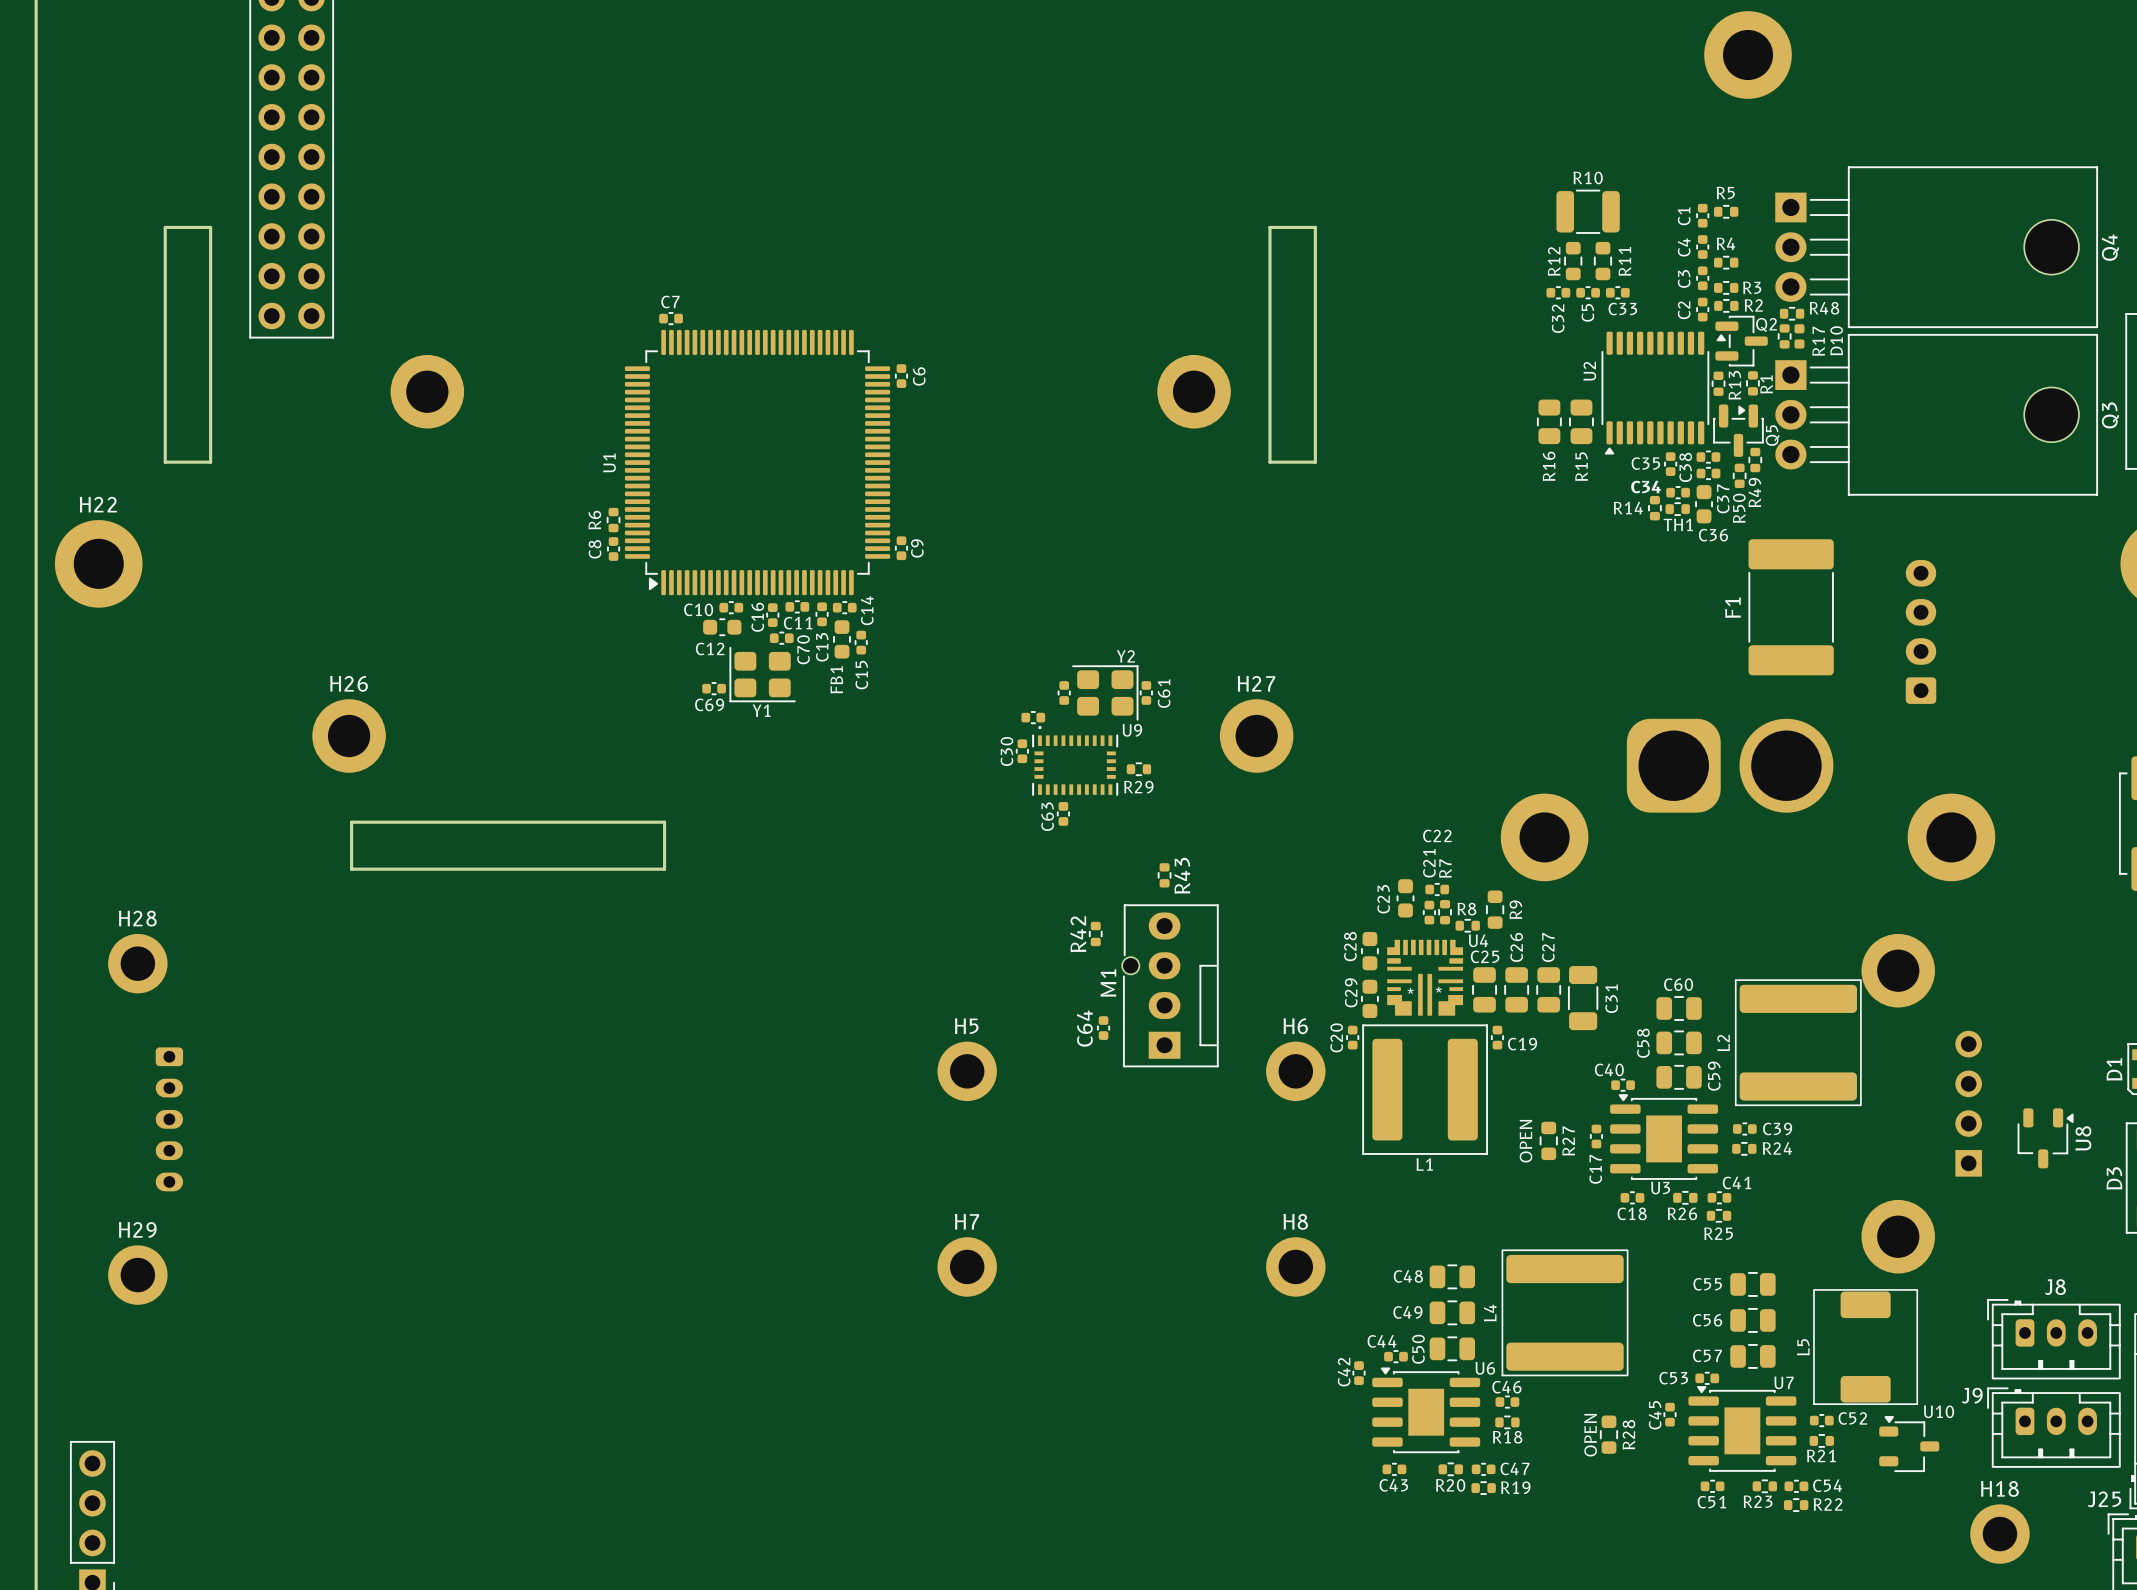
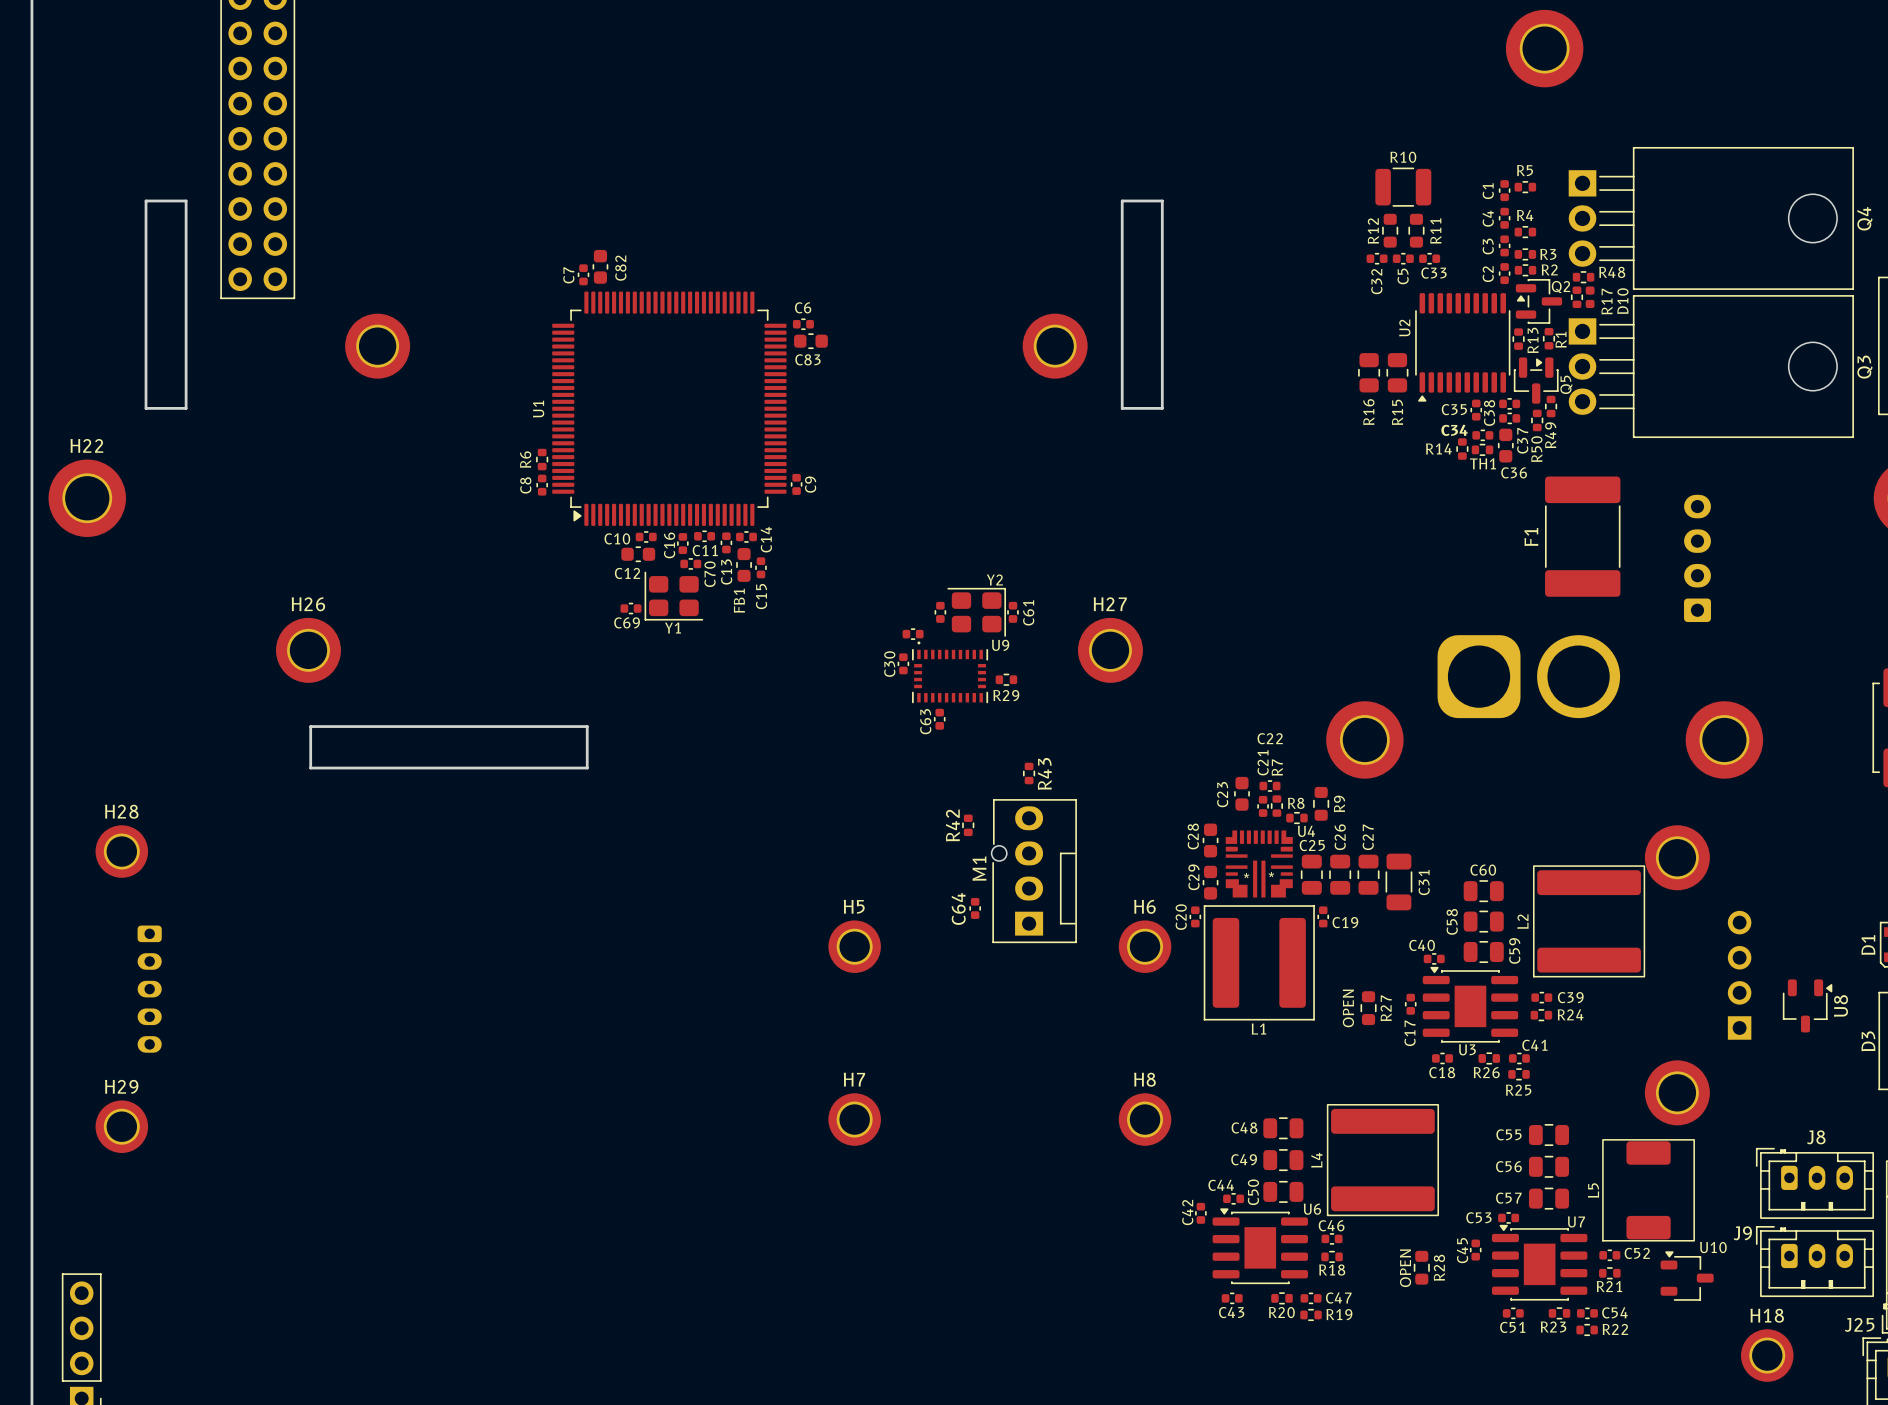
C82: none -> (600, 266)
C7 rotation: 0° (671, 318) -> 90° clockwise (583, 274)
C6 rotation: 0° (901, 376) -> 90° clockwise (803, 324)
C83: none -> (810, 341)

